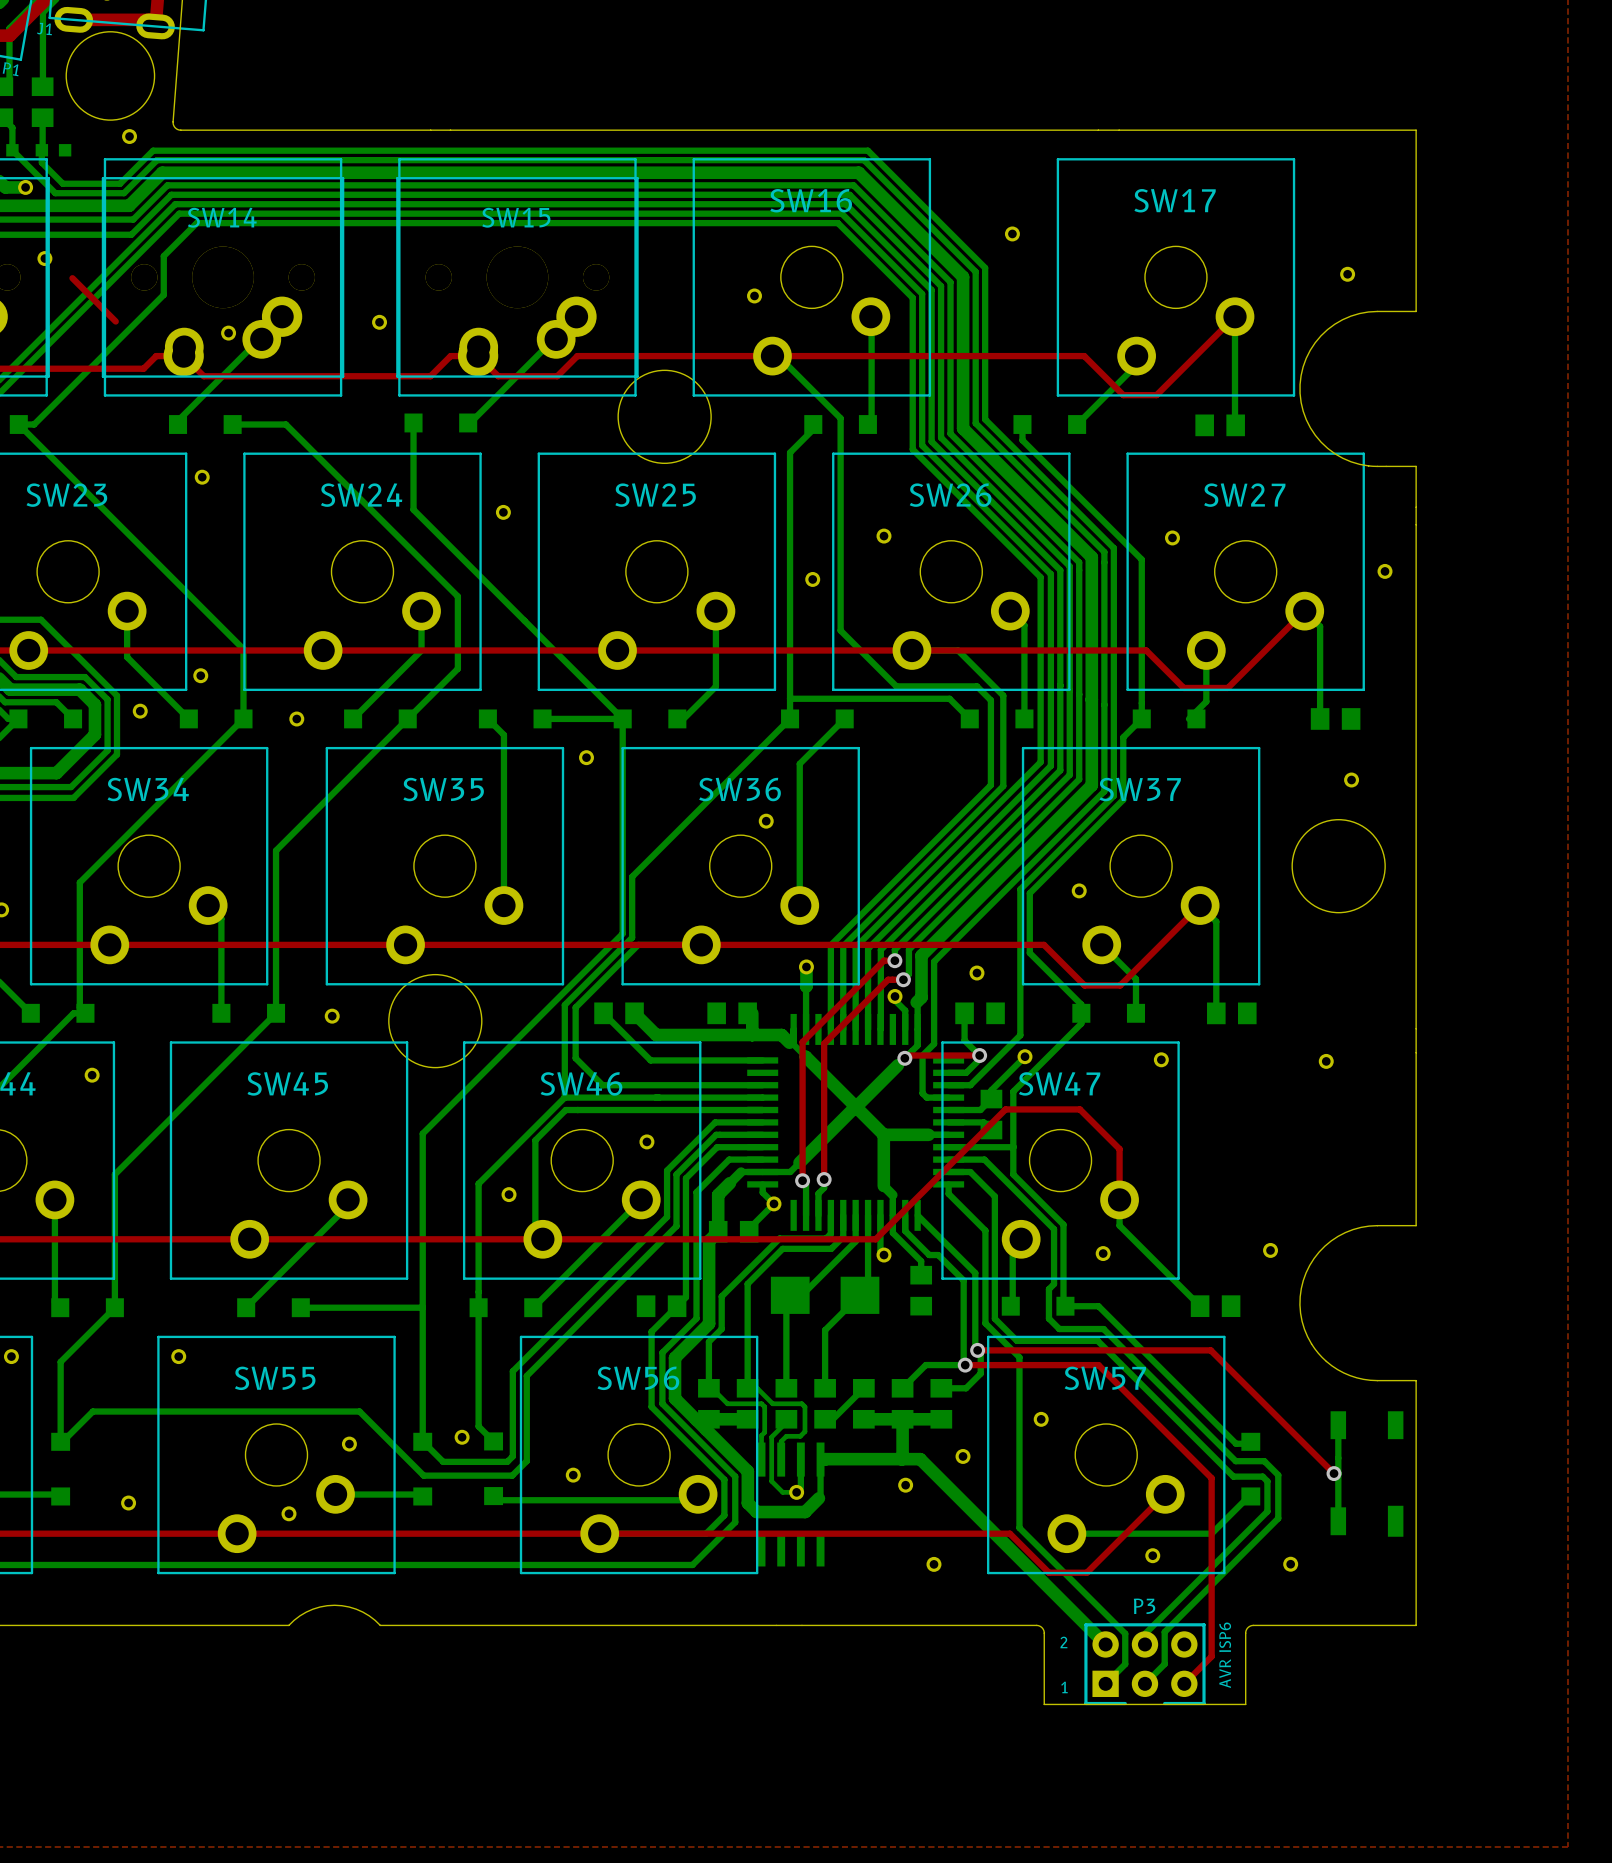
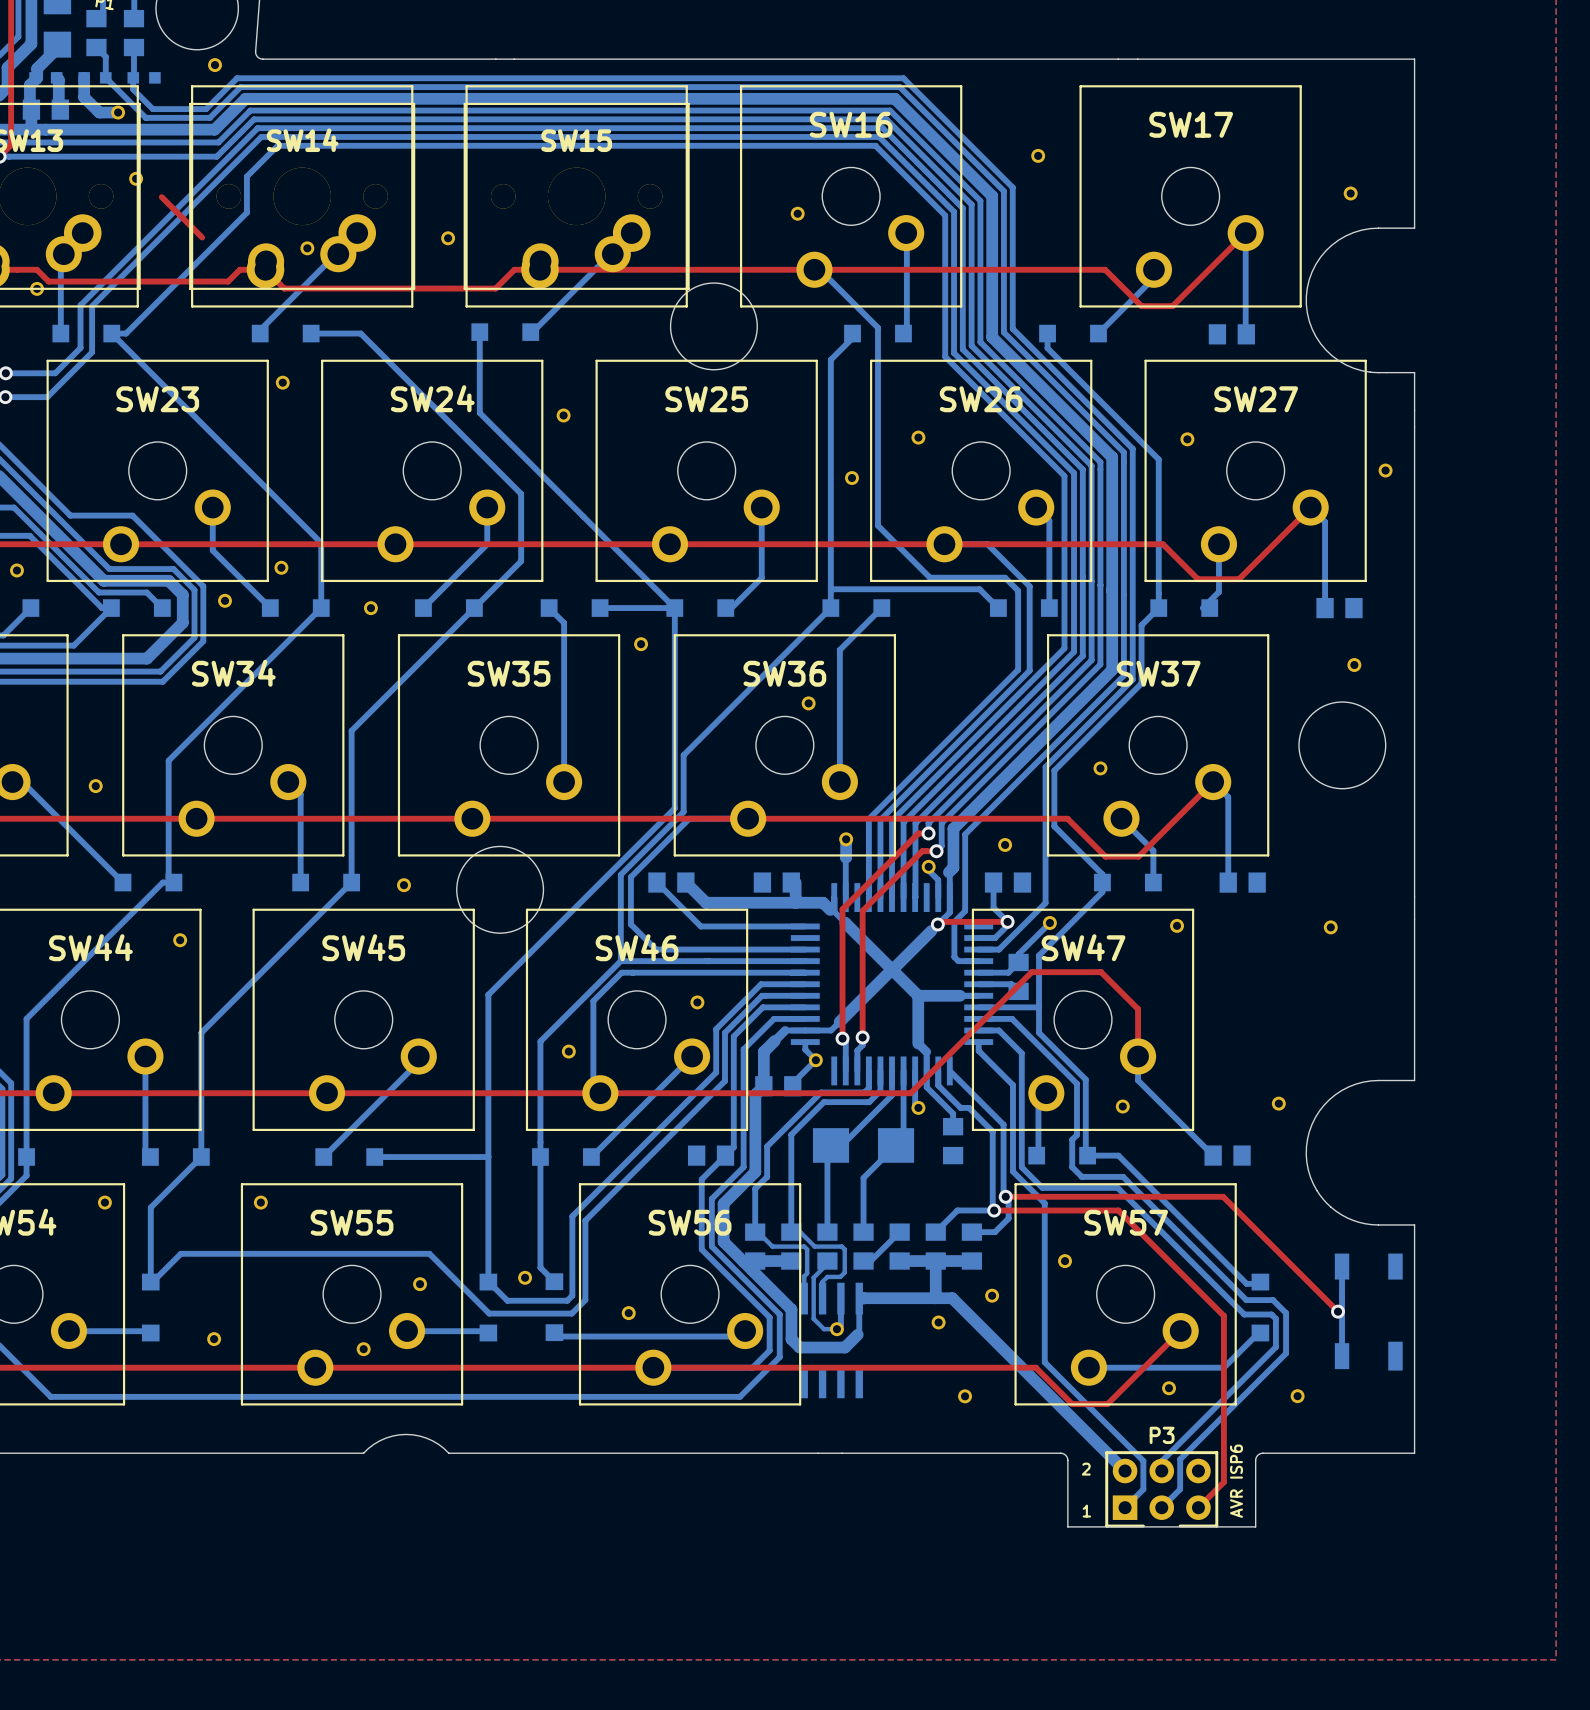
top track: (478, 356) (498, 376) (557, 376) (577, 356) -> (539, 269) (632, 269)

